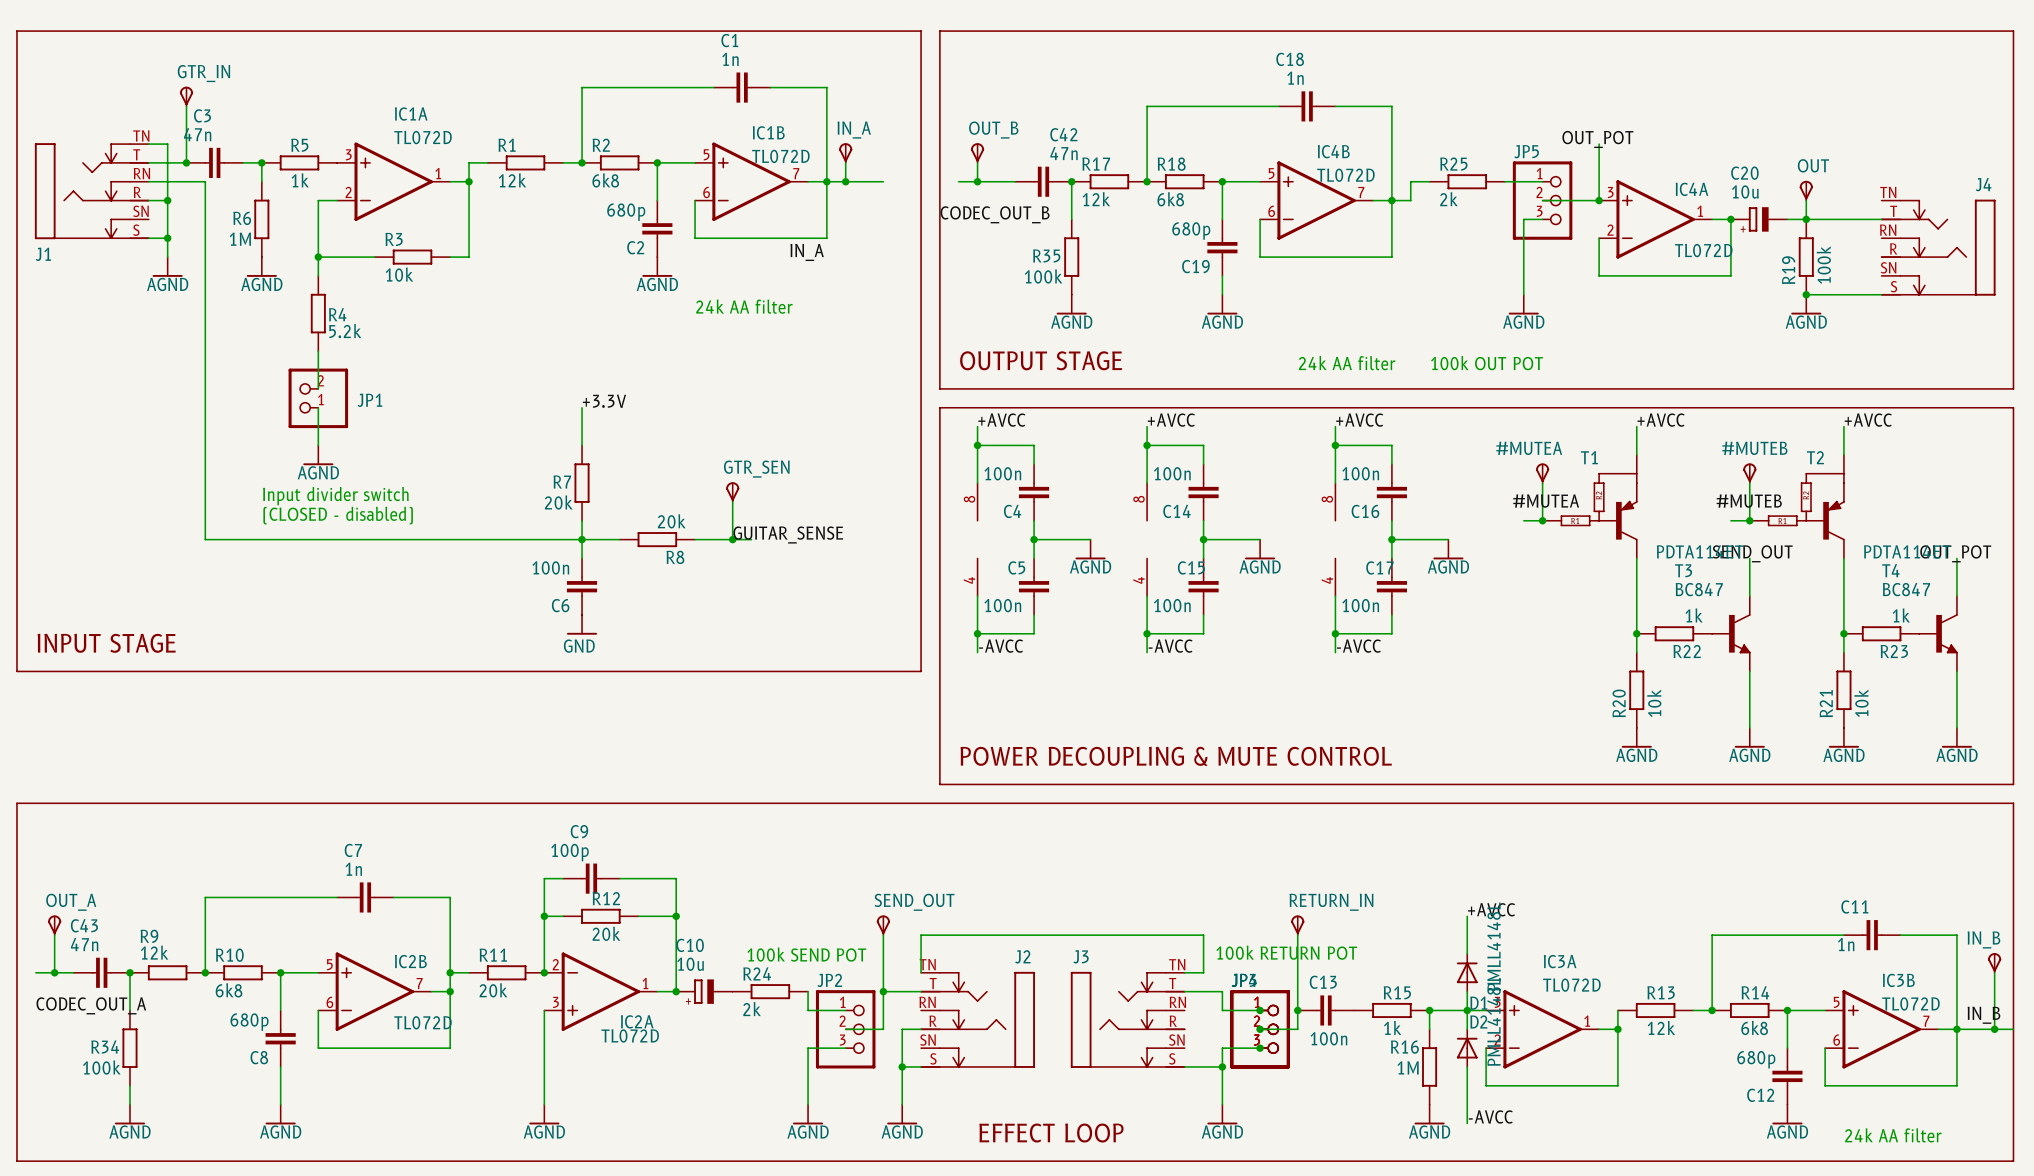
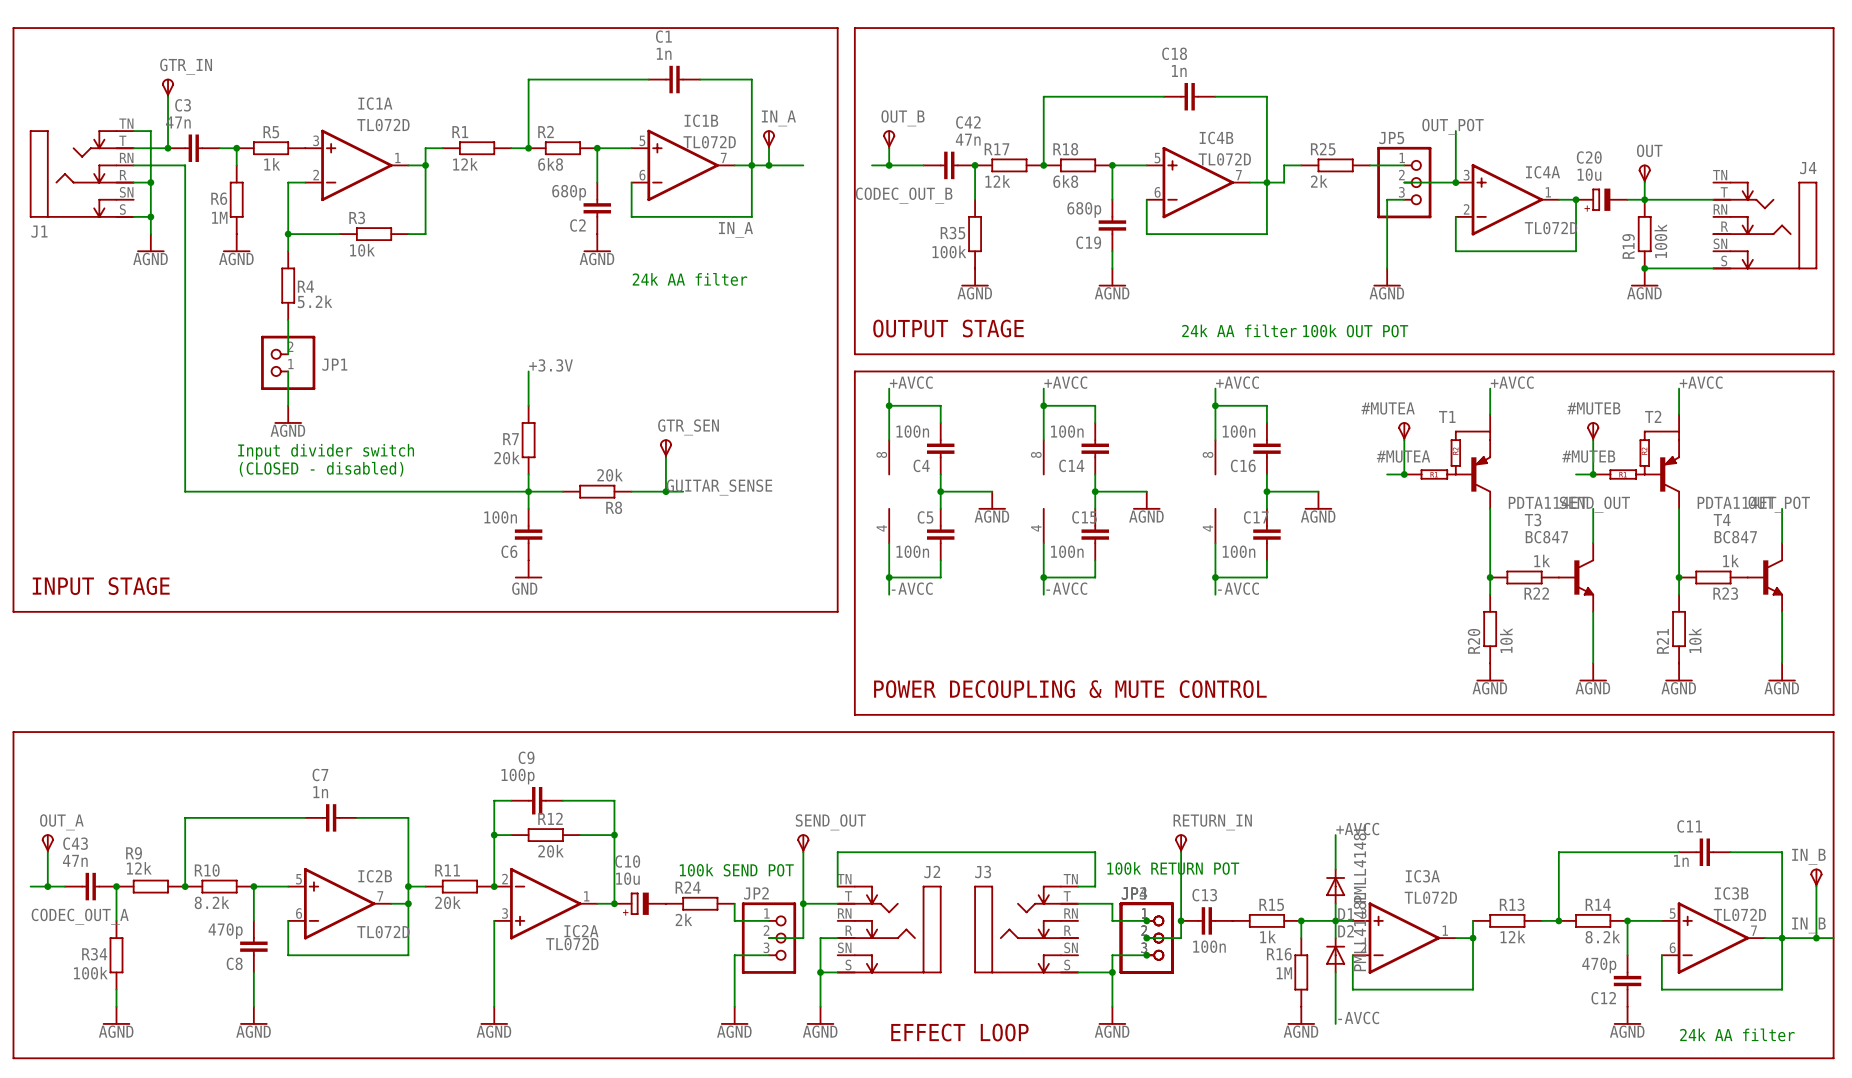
R10 value: 6k8 (229, 990) -> 8.2k (212, 902)
C8 value: 680p (249, 1022) -> 470p (225, 931)
R14 value: 6k8 (1754, 1028) -> 8.2k (1602, 937)
C12 value: 680p (1756, 1059) -> 470p (1599, 965)

